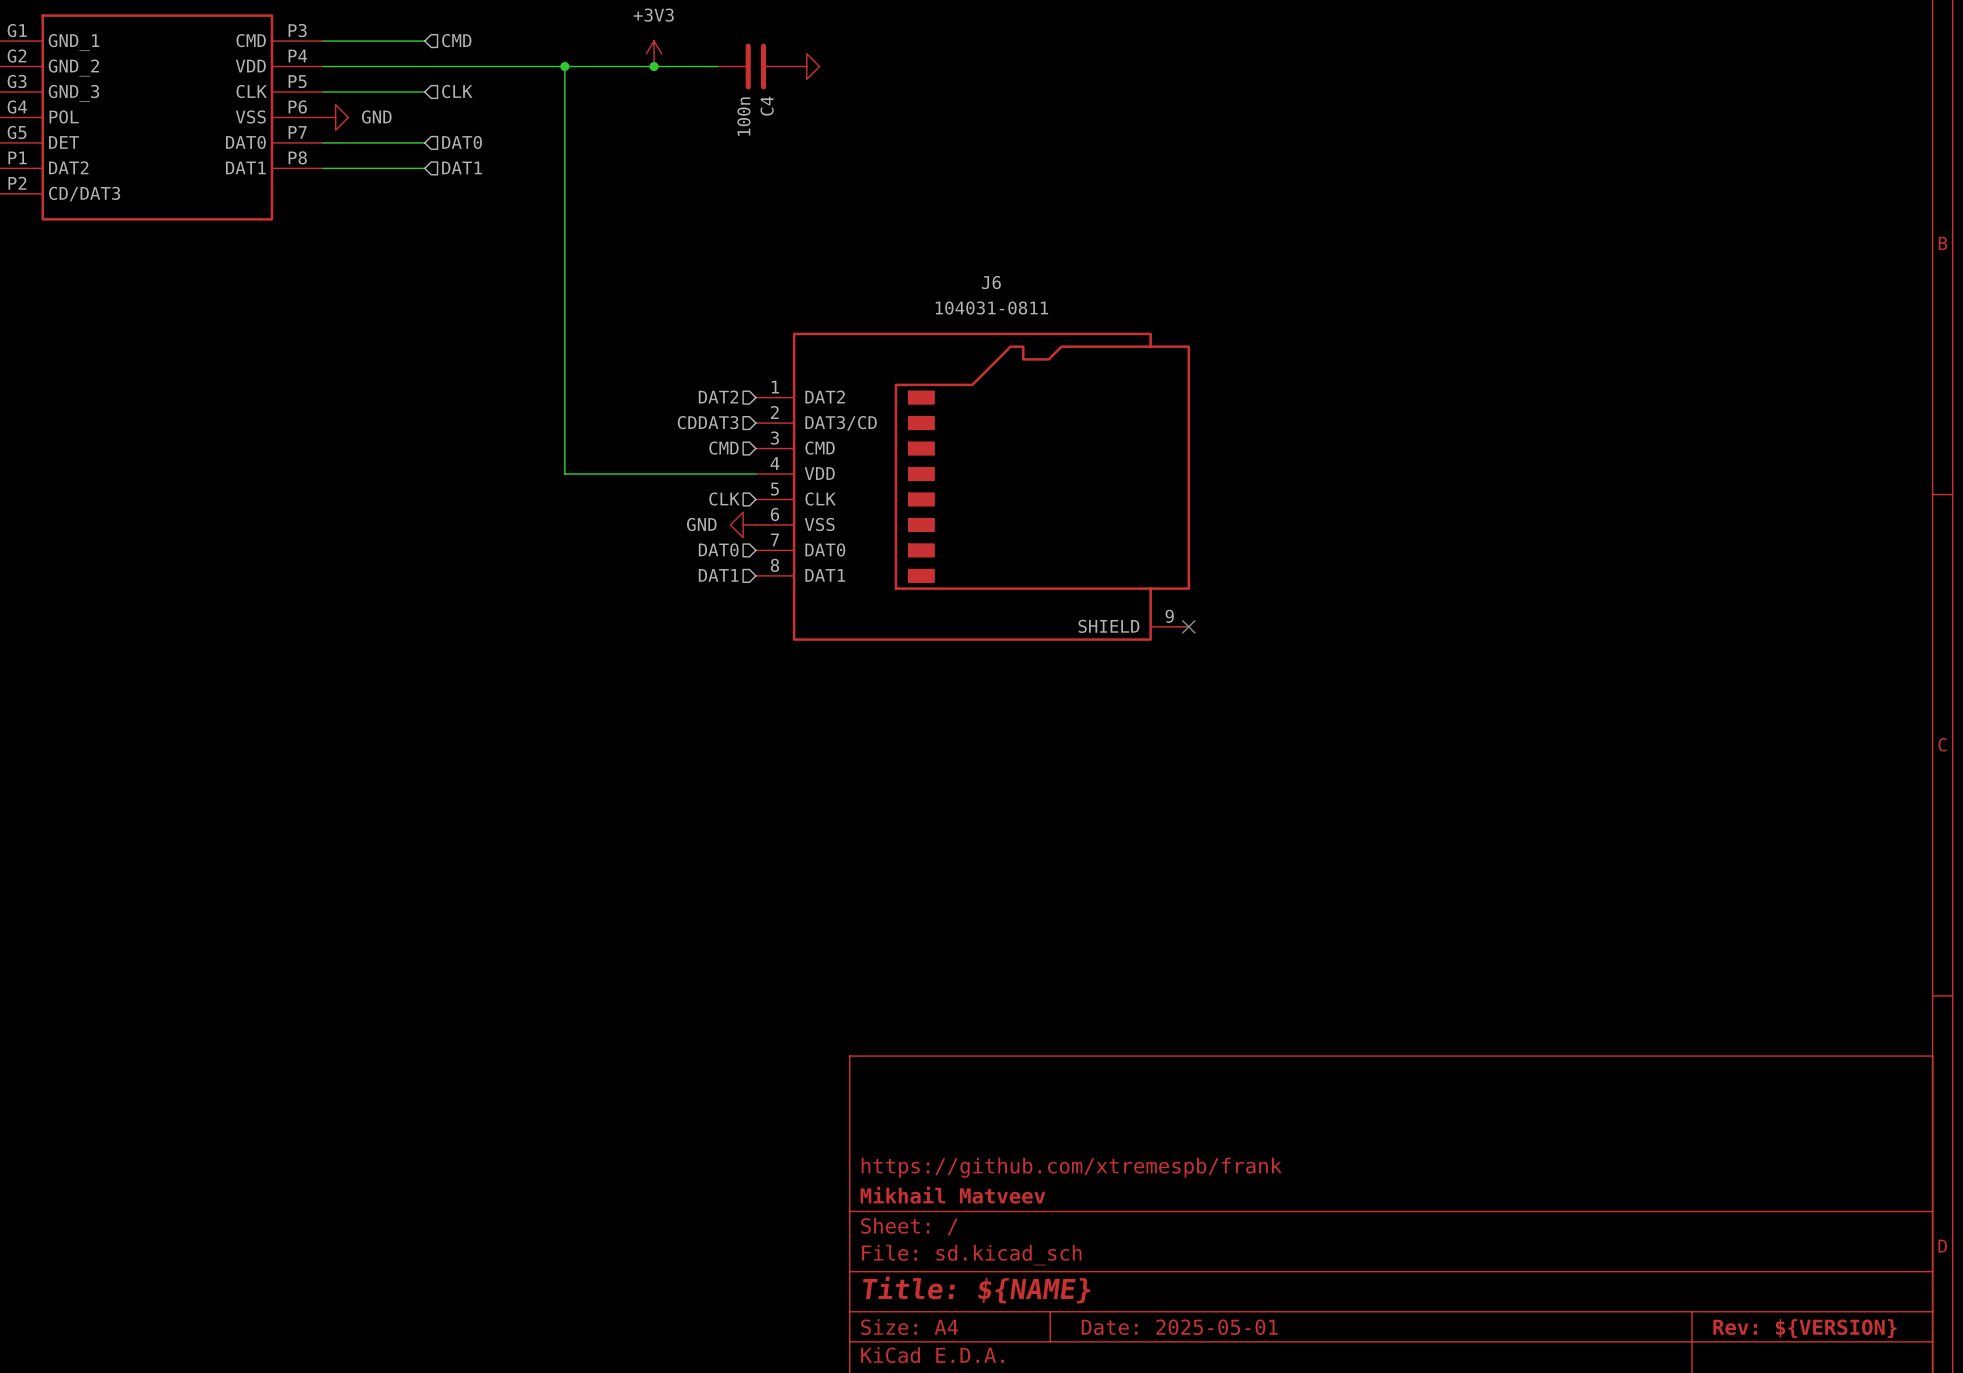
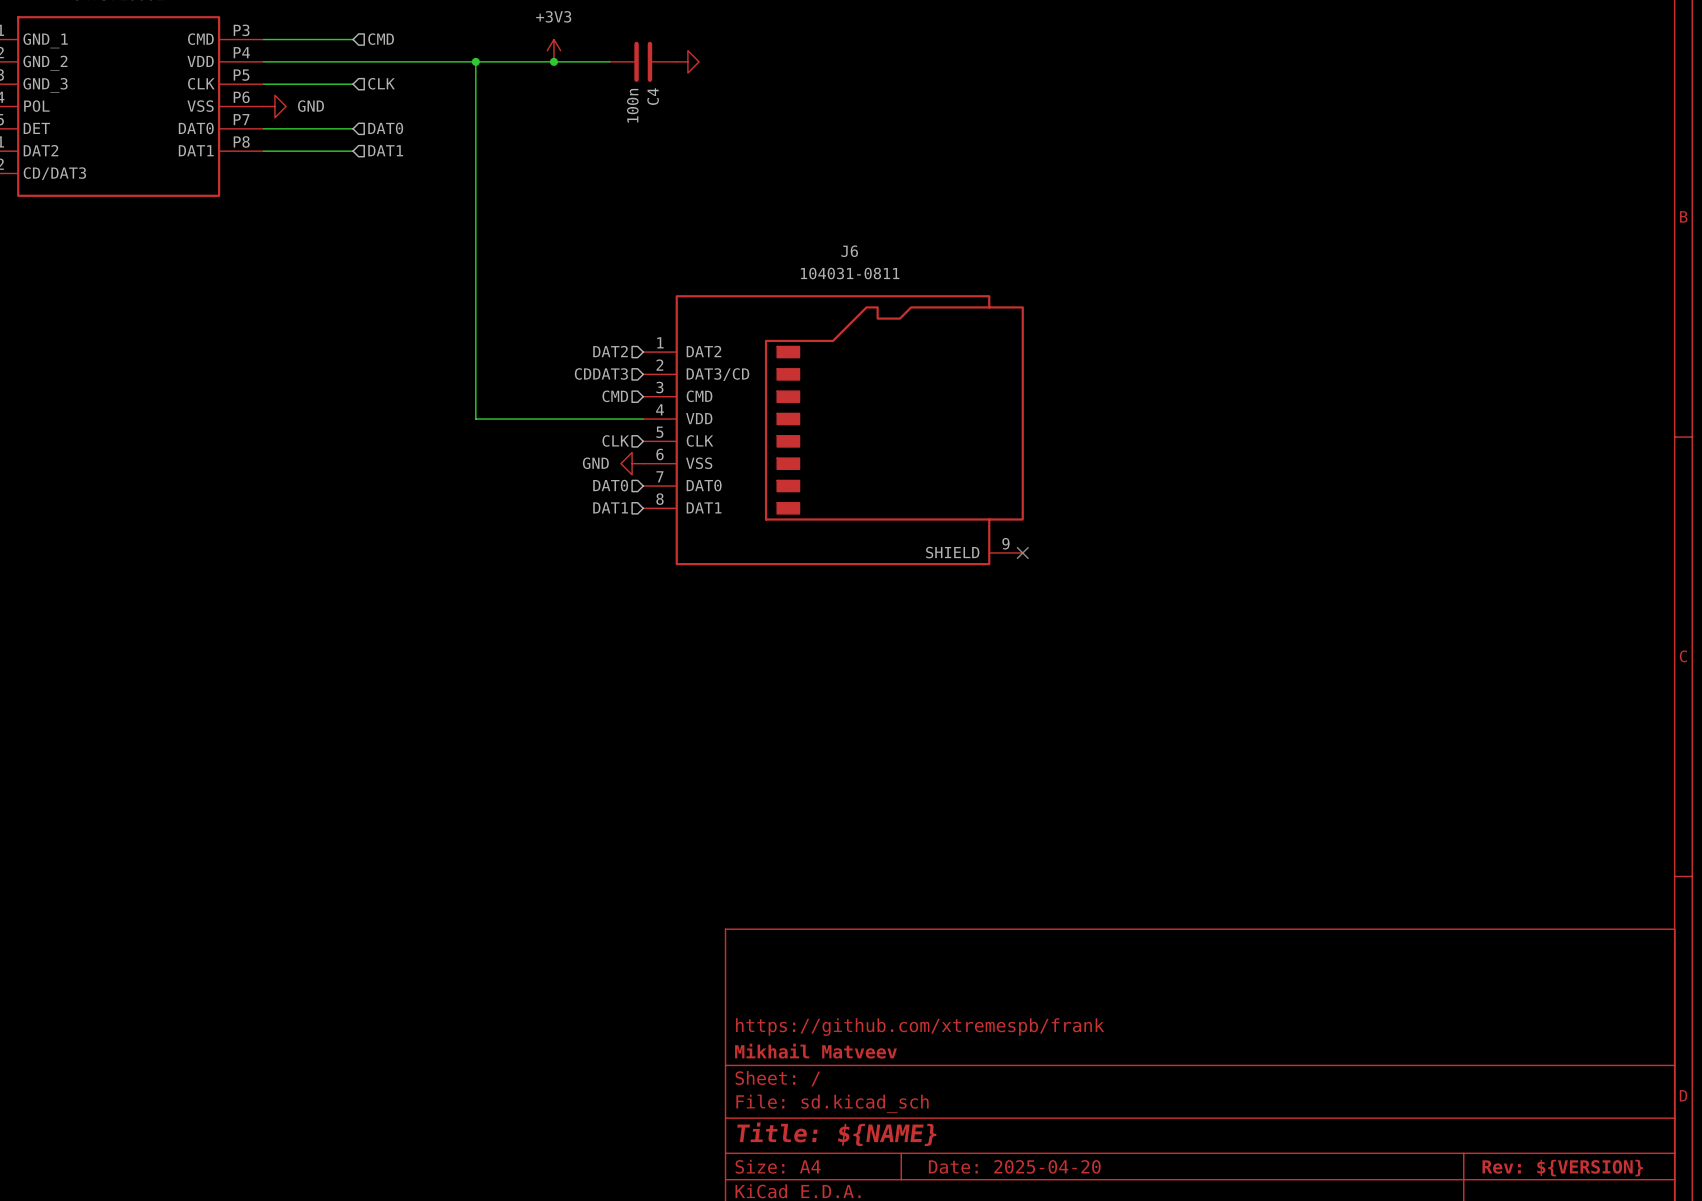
title block: Date: 2025-05-01 (1179, 1327) -> Date: 2025-04-20 (1014, 1166)

